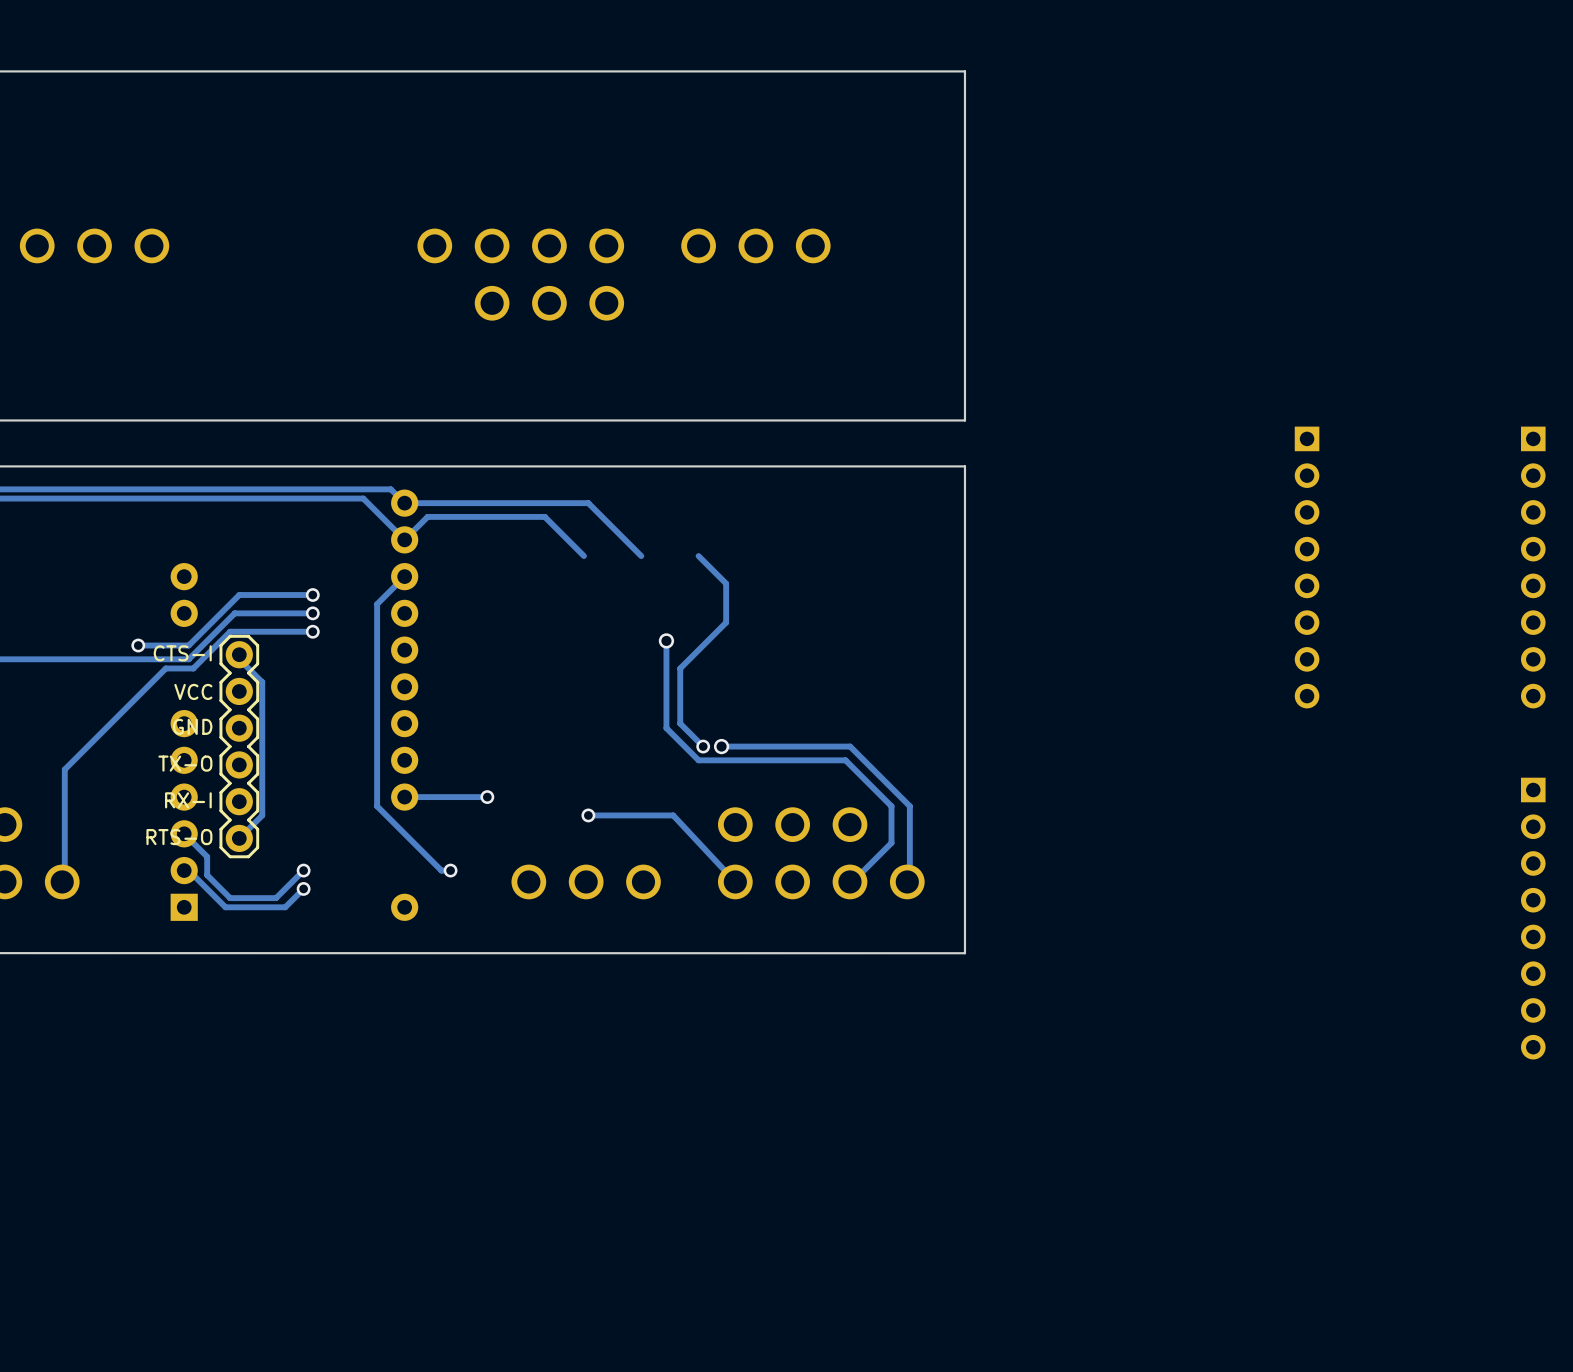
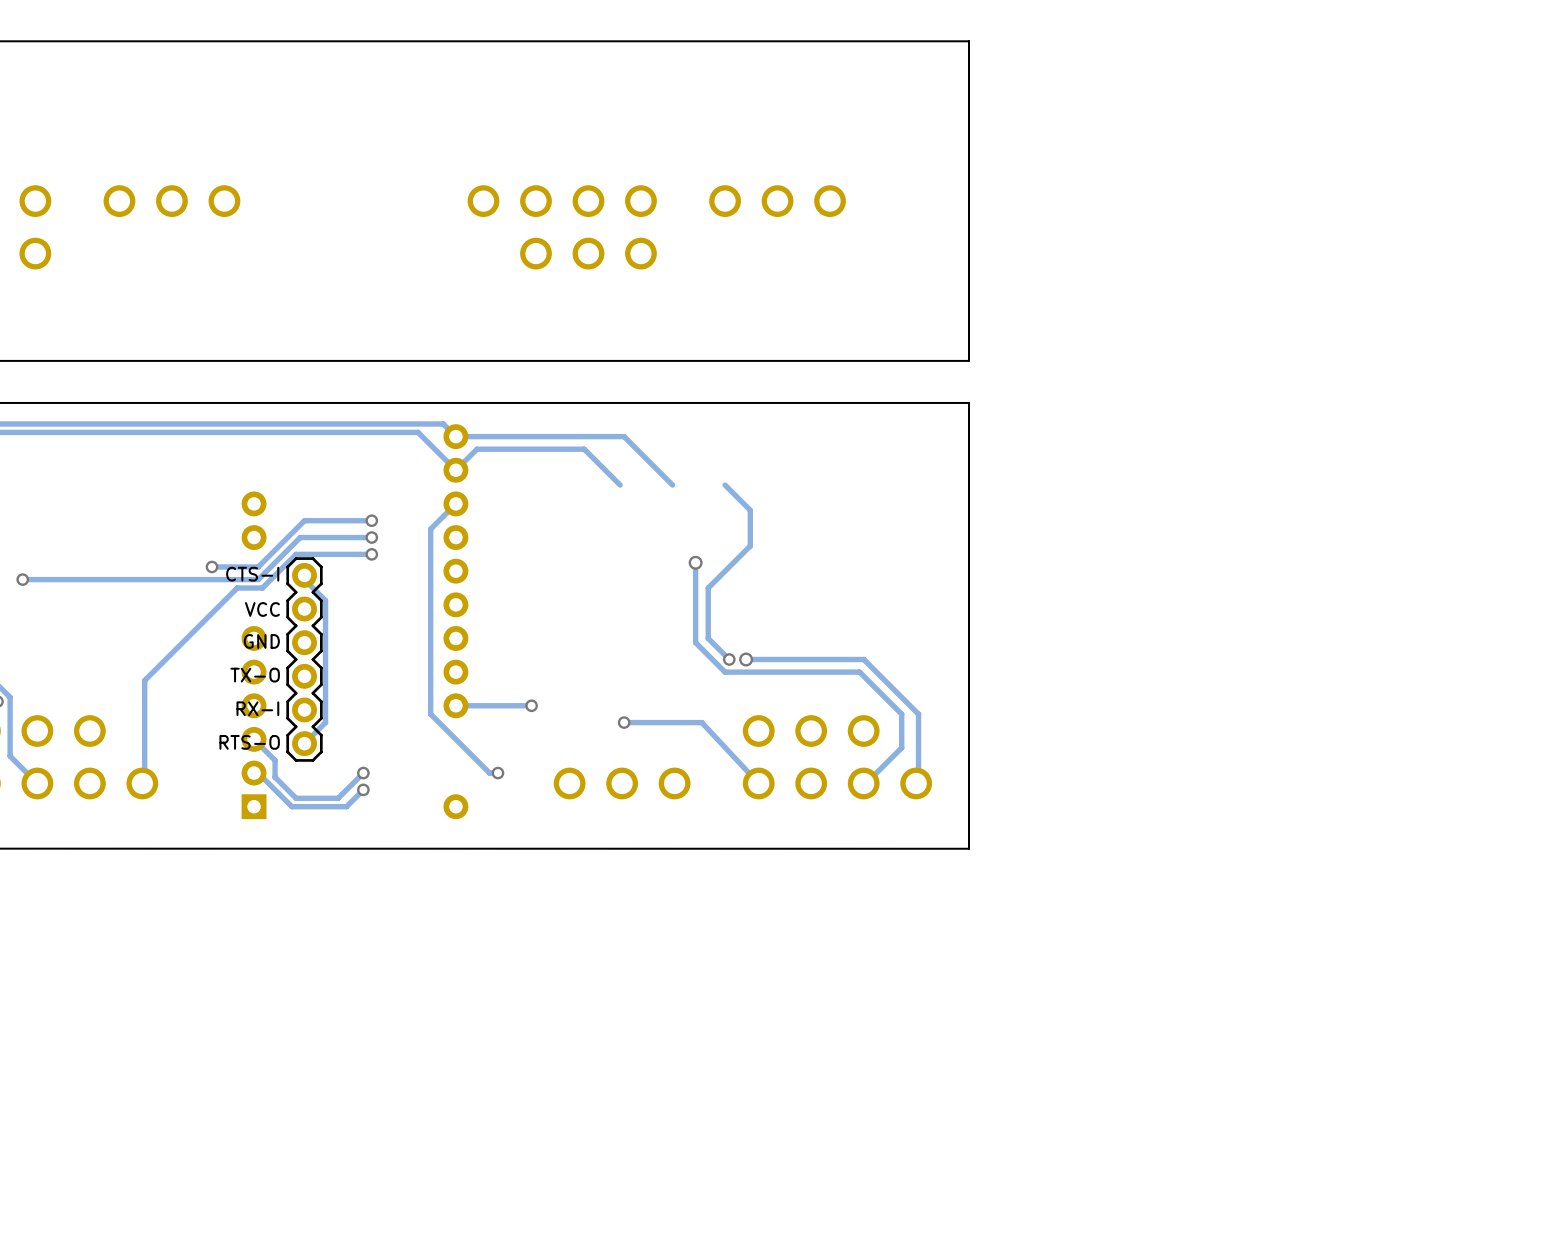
part: (1307, 567) -> none
part: (1533, 567) -> none
part: (1533, 918) -> none

